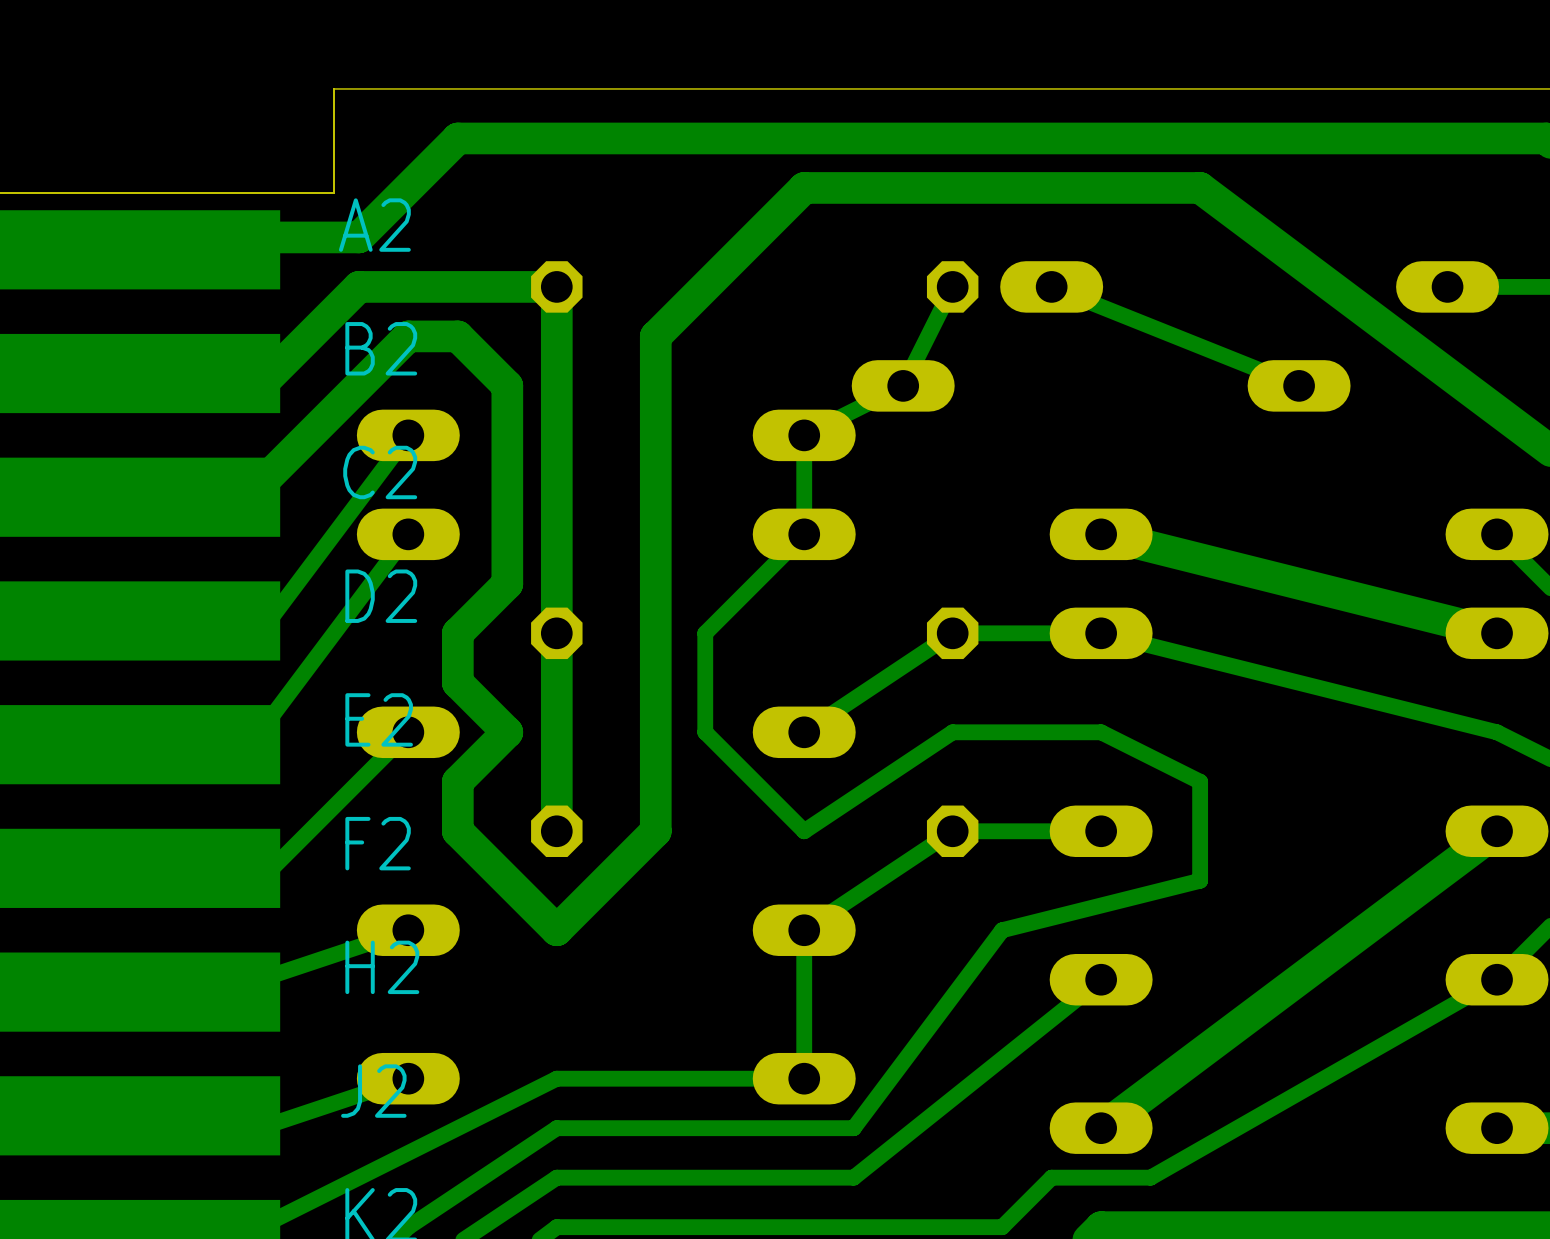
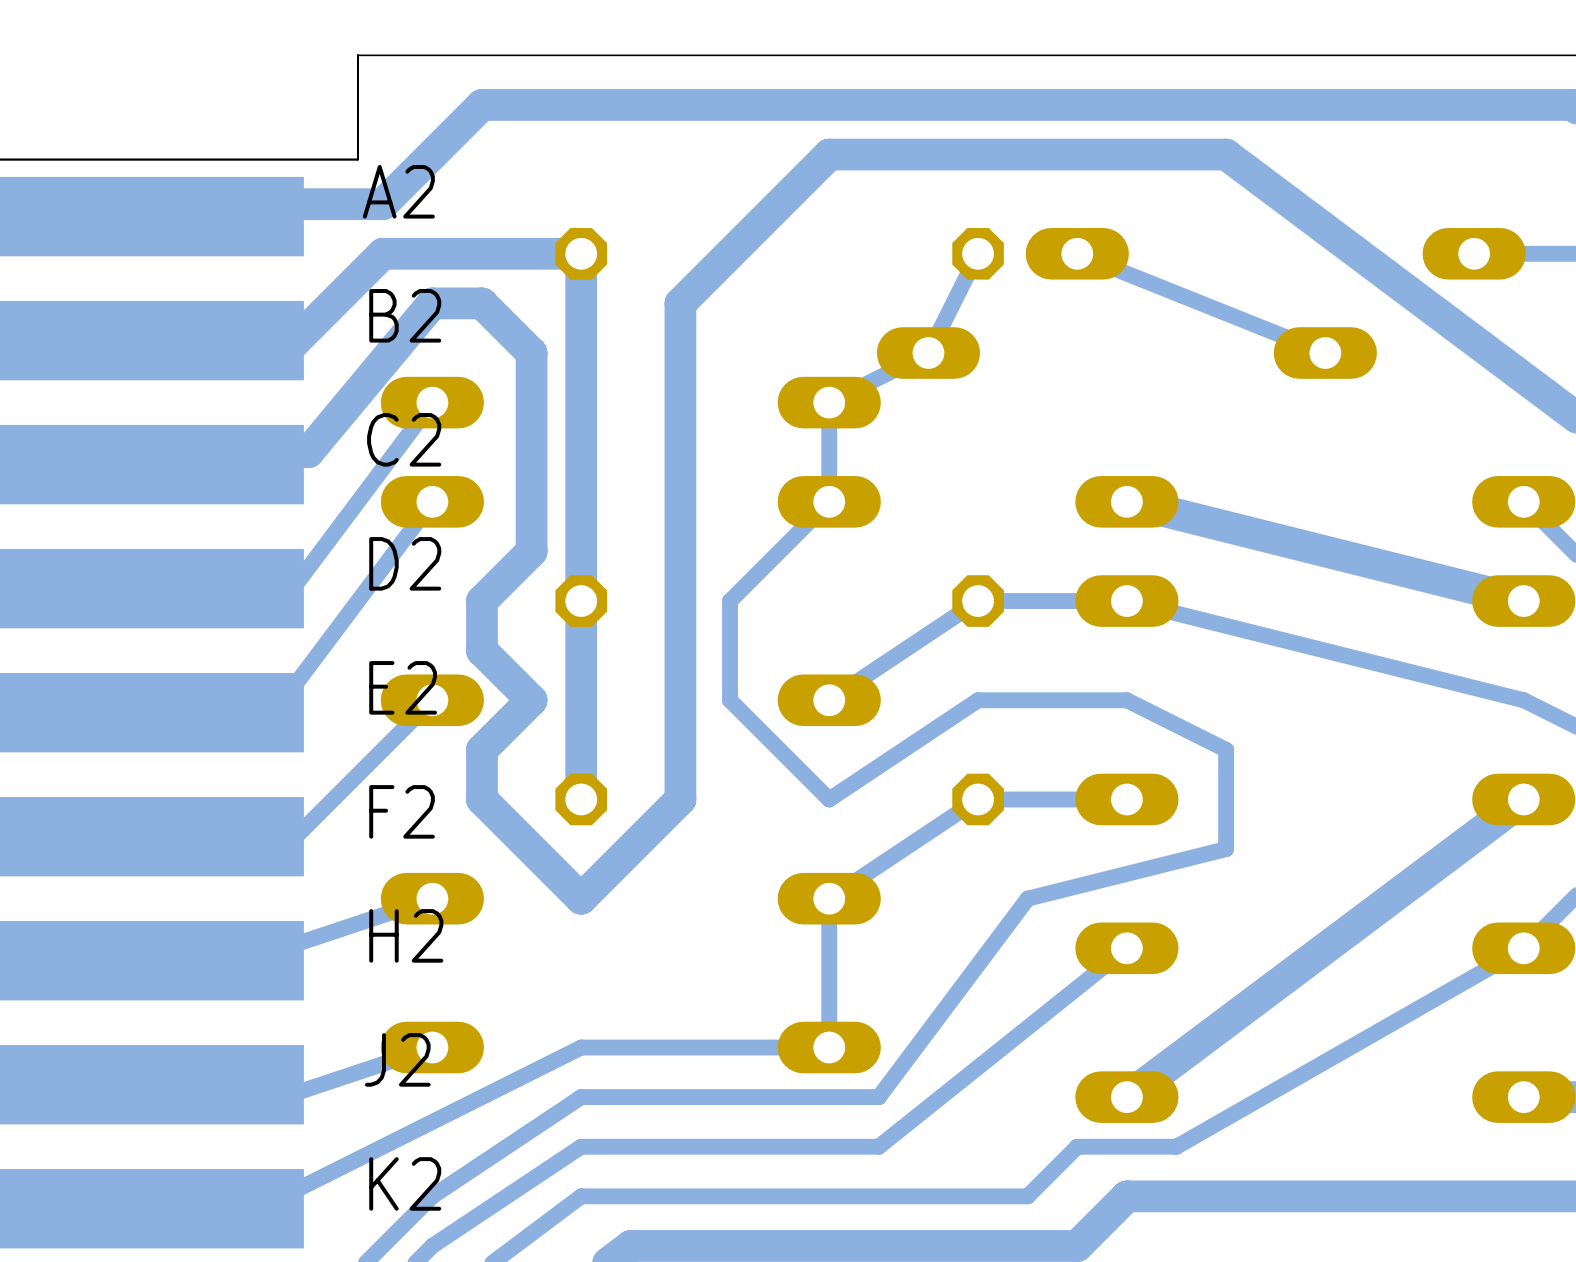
bottom track: (408, 336) (259, 484) -> (432, 303) (308, 452) (283, 452)

